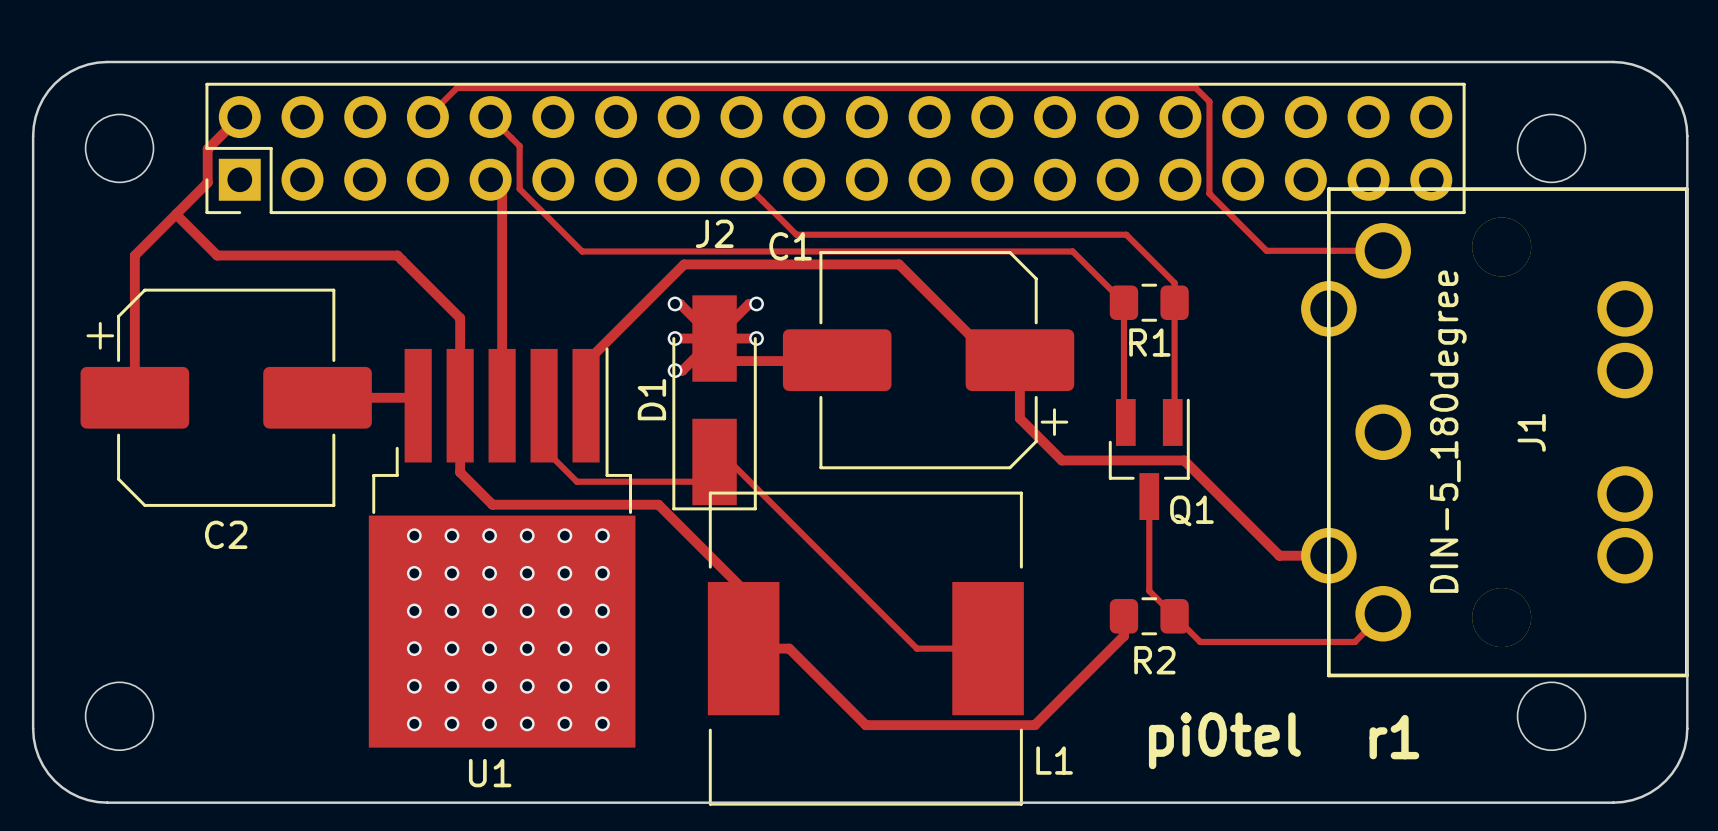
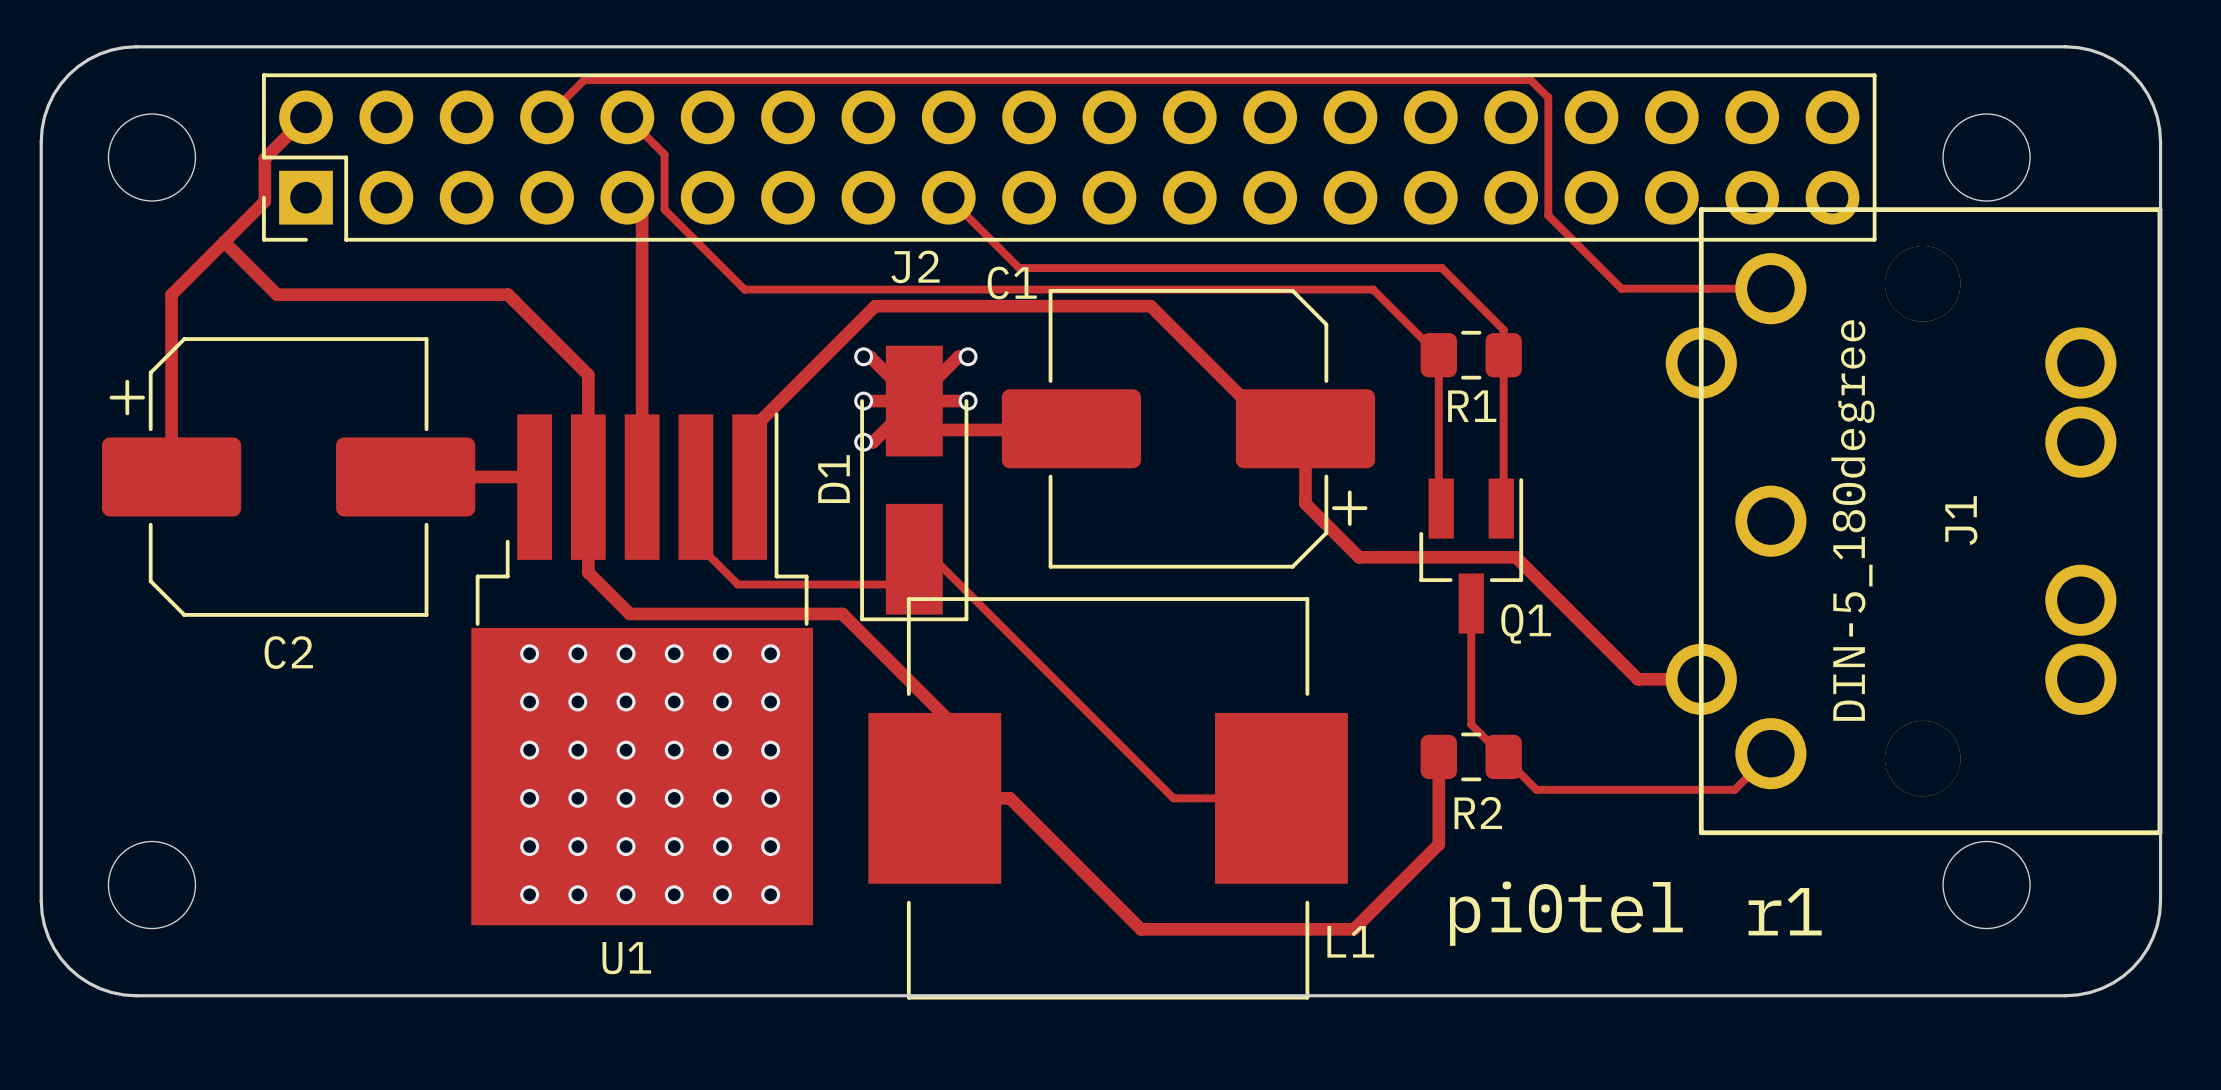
L1 footprint: [707, 491, 1024, 806] -> [868, 597, 1348, 1000]
track: (1123, 636) (1034, 725) (865, 725) -> (1438, 782) (1438, 844) (1353, 929) (1141, 929) (1108, 896)

